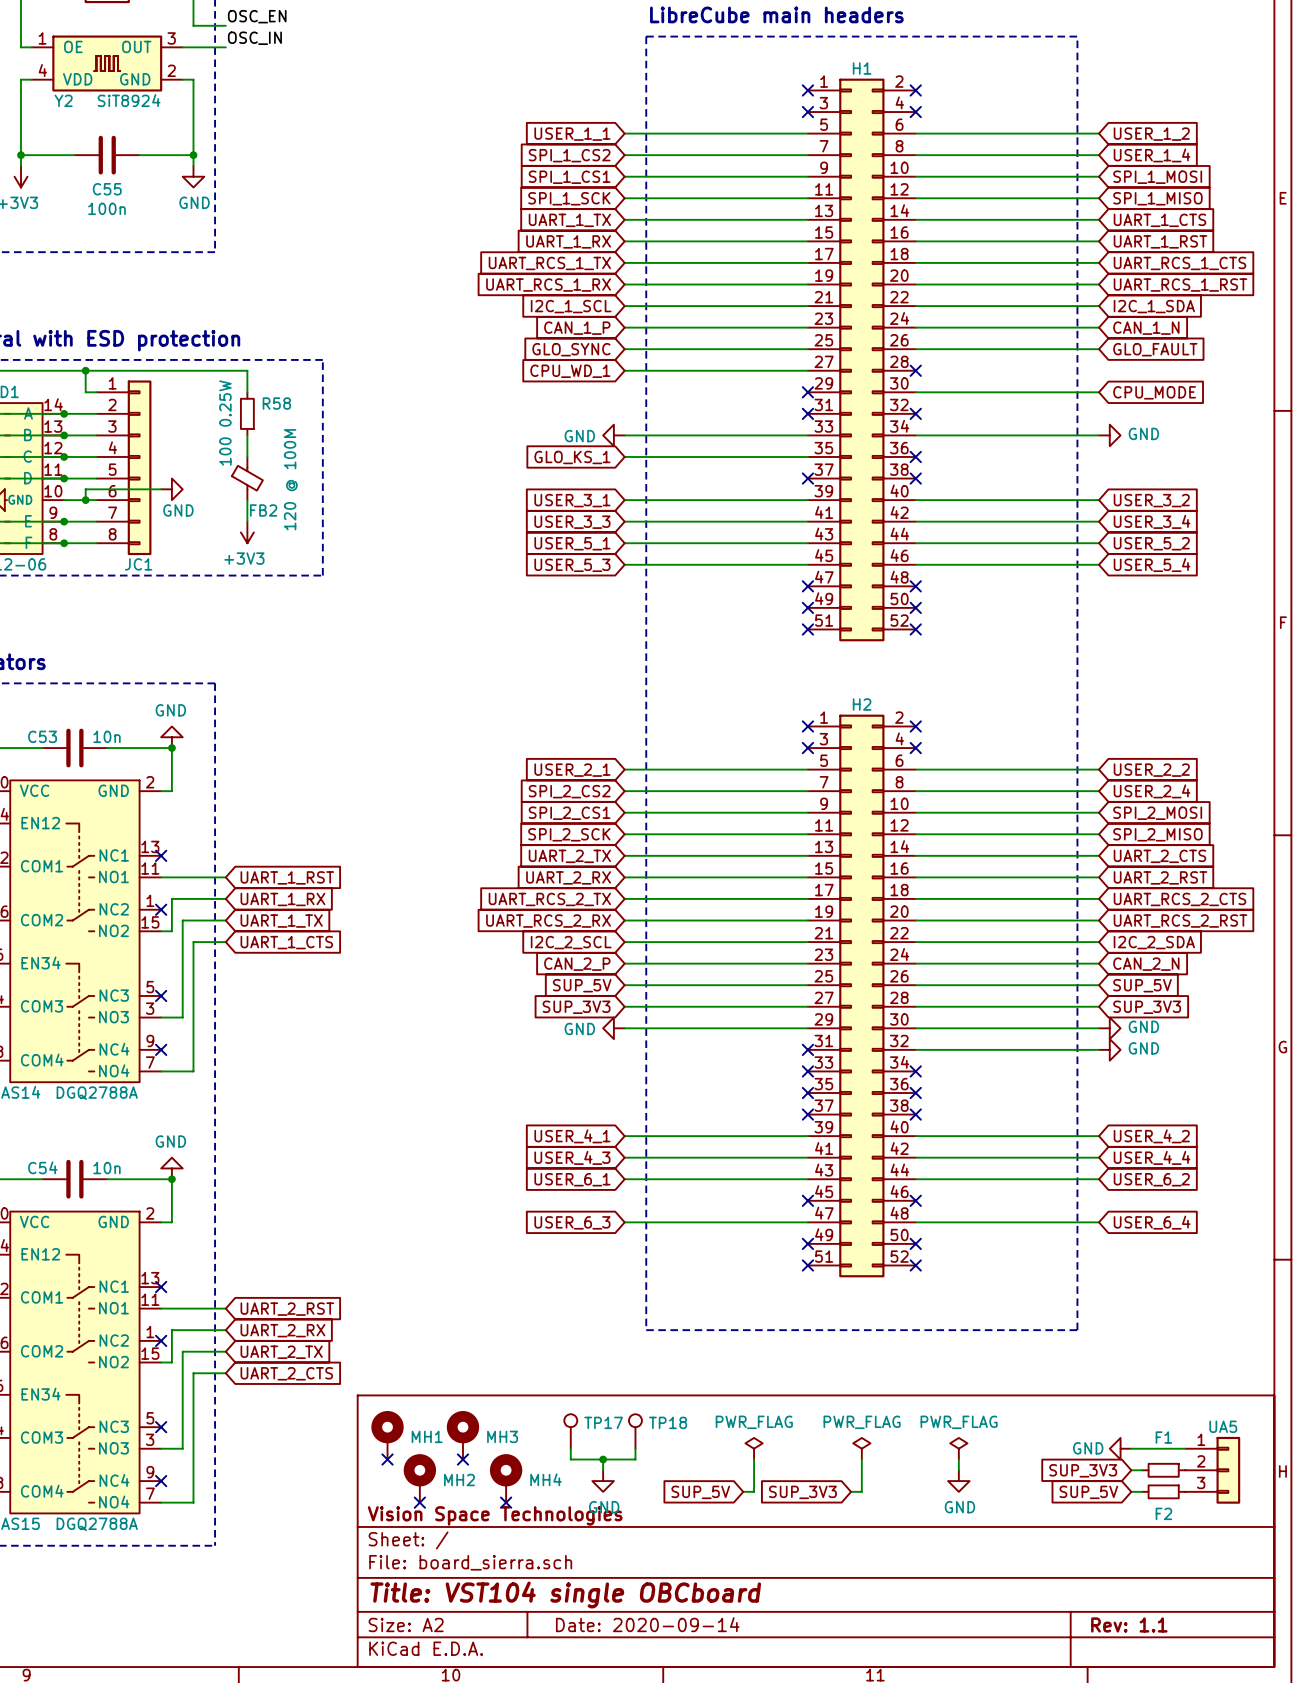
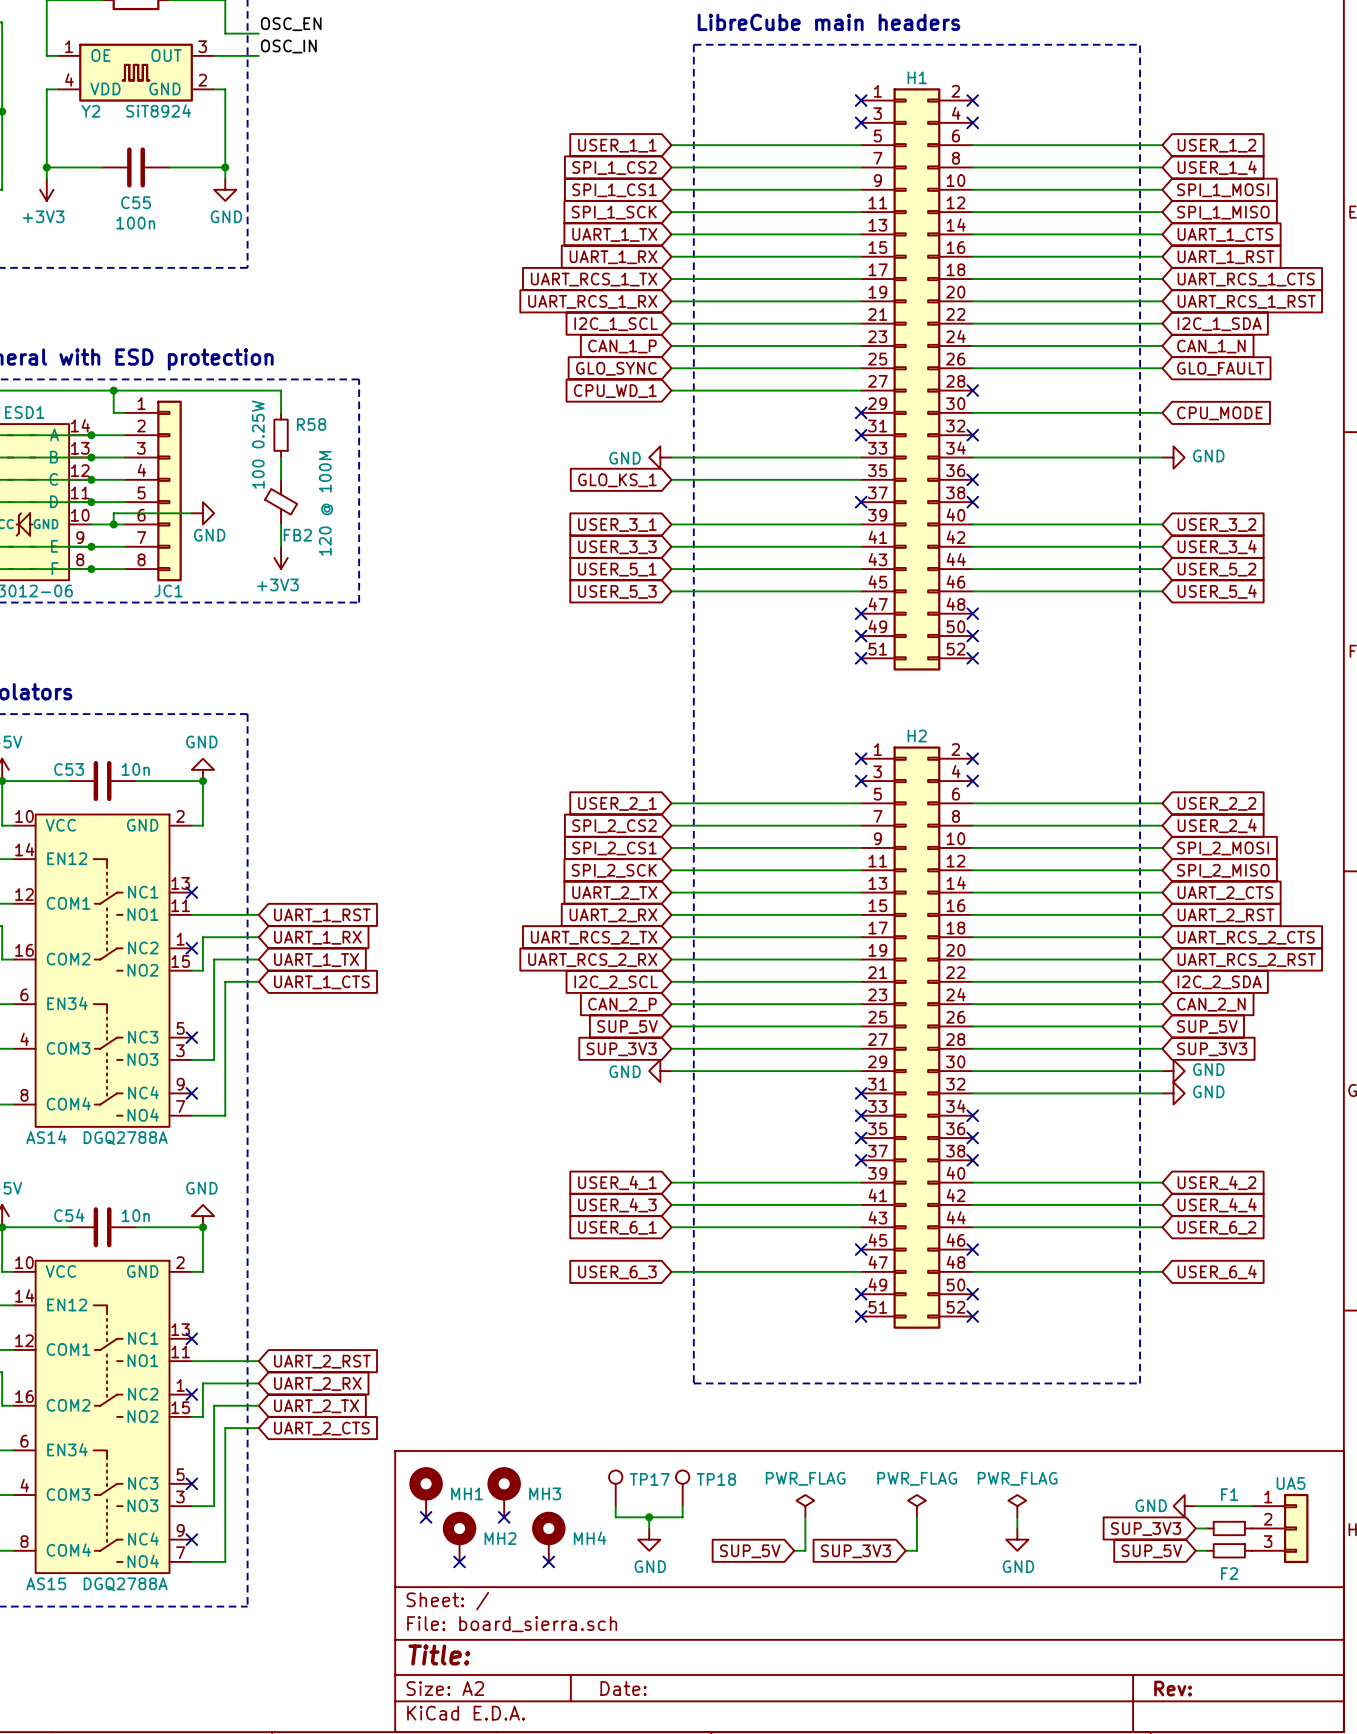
title block: Vision Space Technologies (495, 1515) -> none
title block: Title: VST104 single OBCboard (565, 1594) -> Title: (439, 1655)
title block: Date: 2020-09-14 (647, 1624) -> Date: (623, 1688)
title block: Rev: 1.1 (1129, 1624) -> Rev: (1173, 1688)

